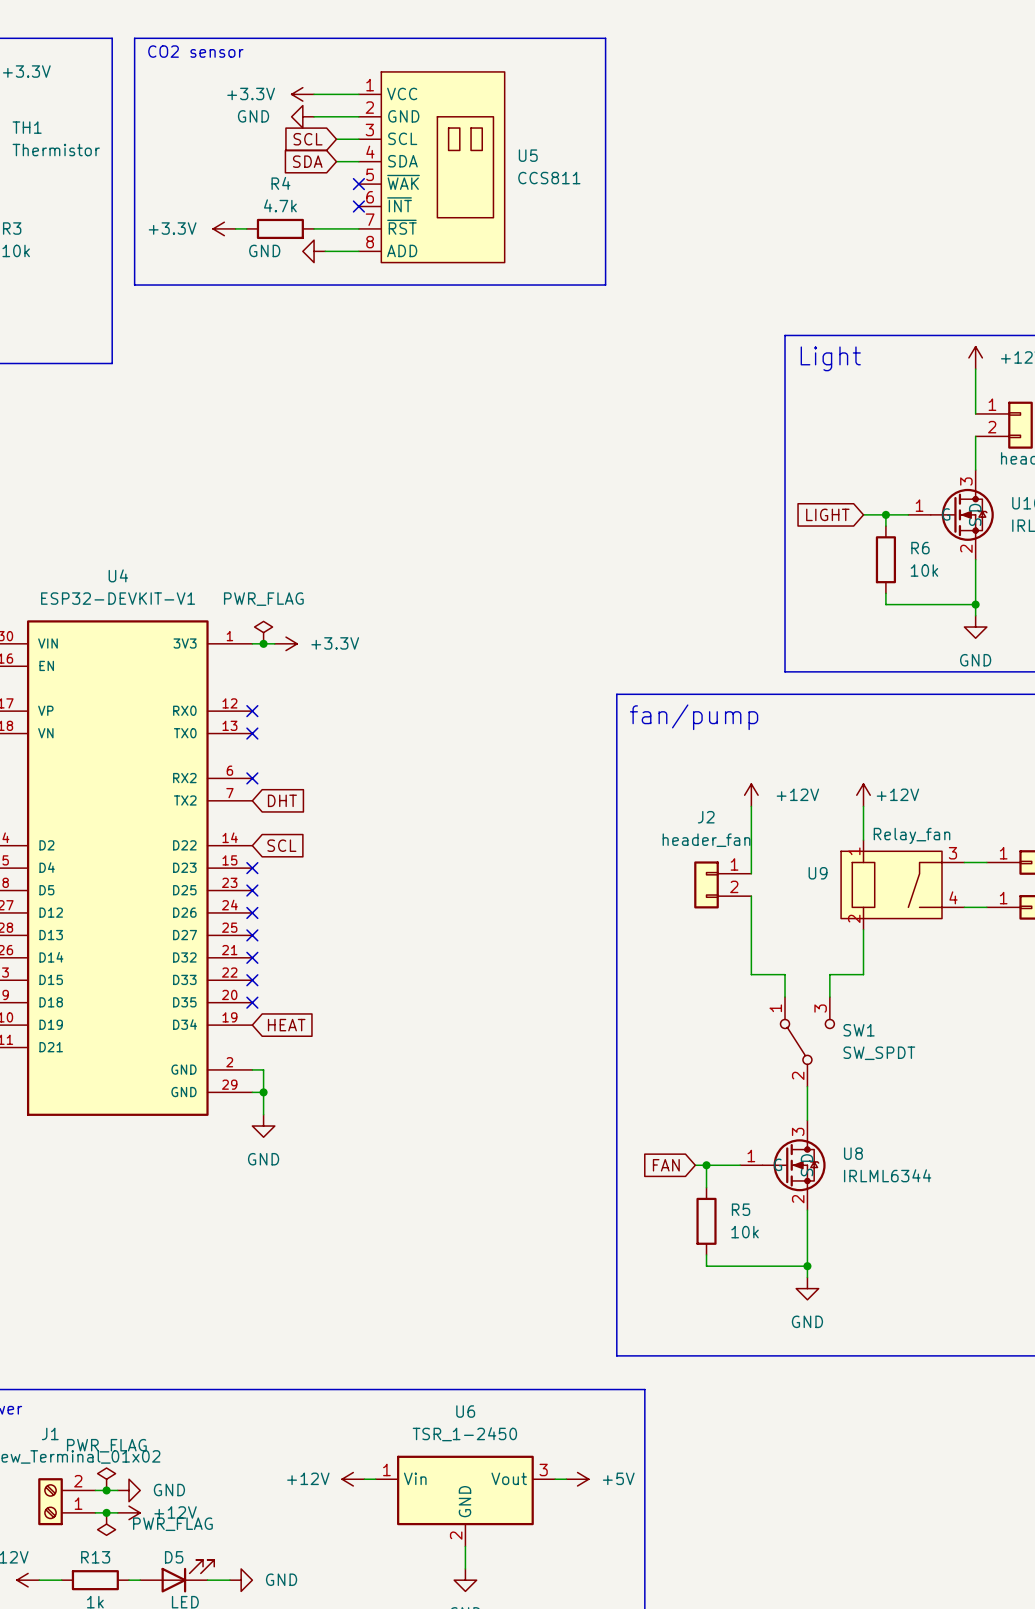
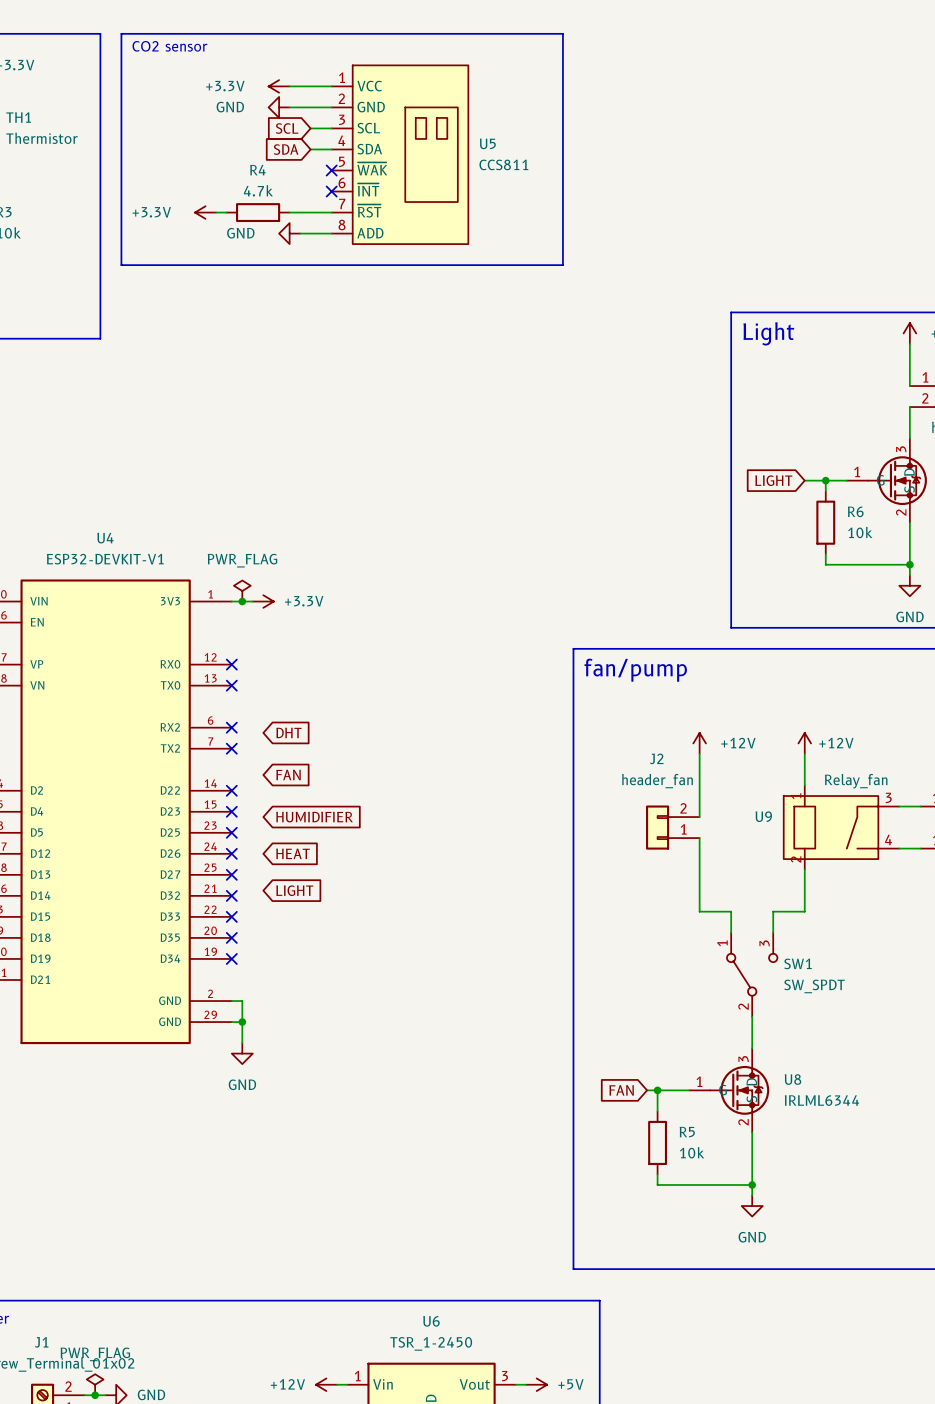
no-connect mark: none -> (231, 748)
global label position: DHT (282, 800) -> DHT (288, 732)
global label: none -> FAN (288, 774)
no-connect mark: none -> (231, 790)
global label: SCL (281, 845) -> none
global label: none -> HUMIDIFIER (314, 817)
J2 flip: as is (706, 884) -> up-down (657, 827)
global label: none -> LIGHT (294, 890)
no-connect mark: none -> (231, 958)
global label position: HEAT (286, 1025) -> HEAT (293, 853)

